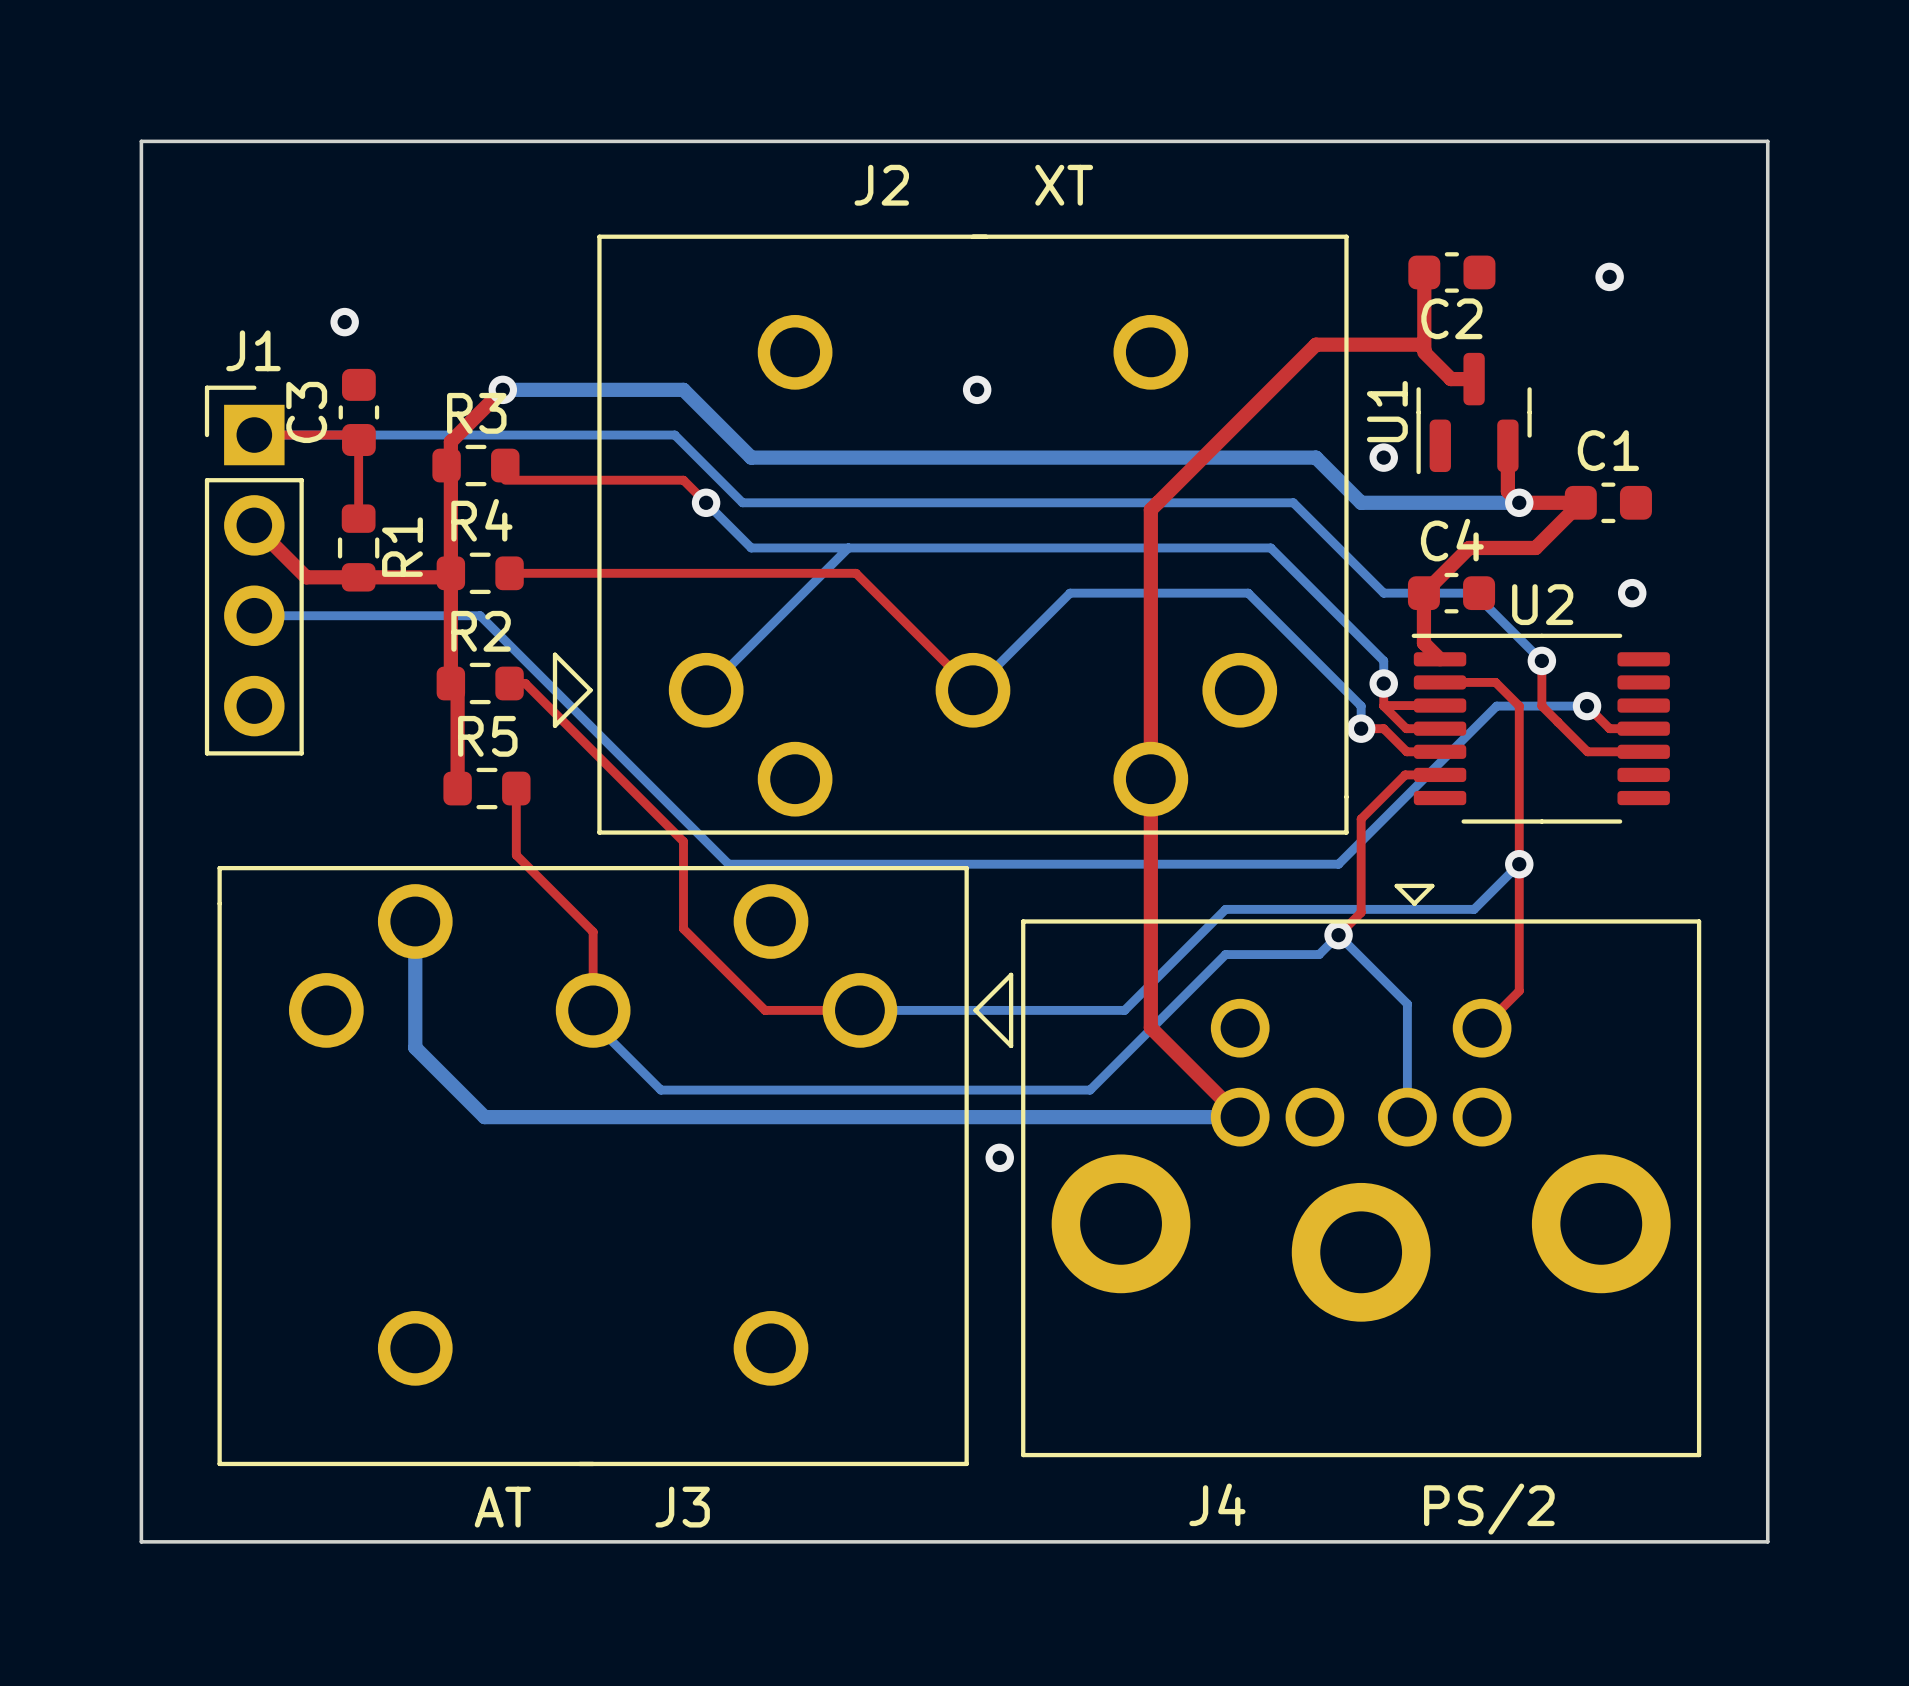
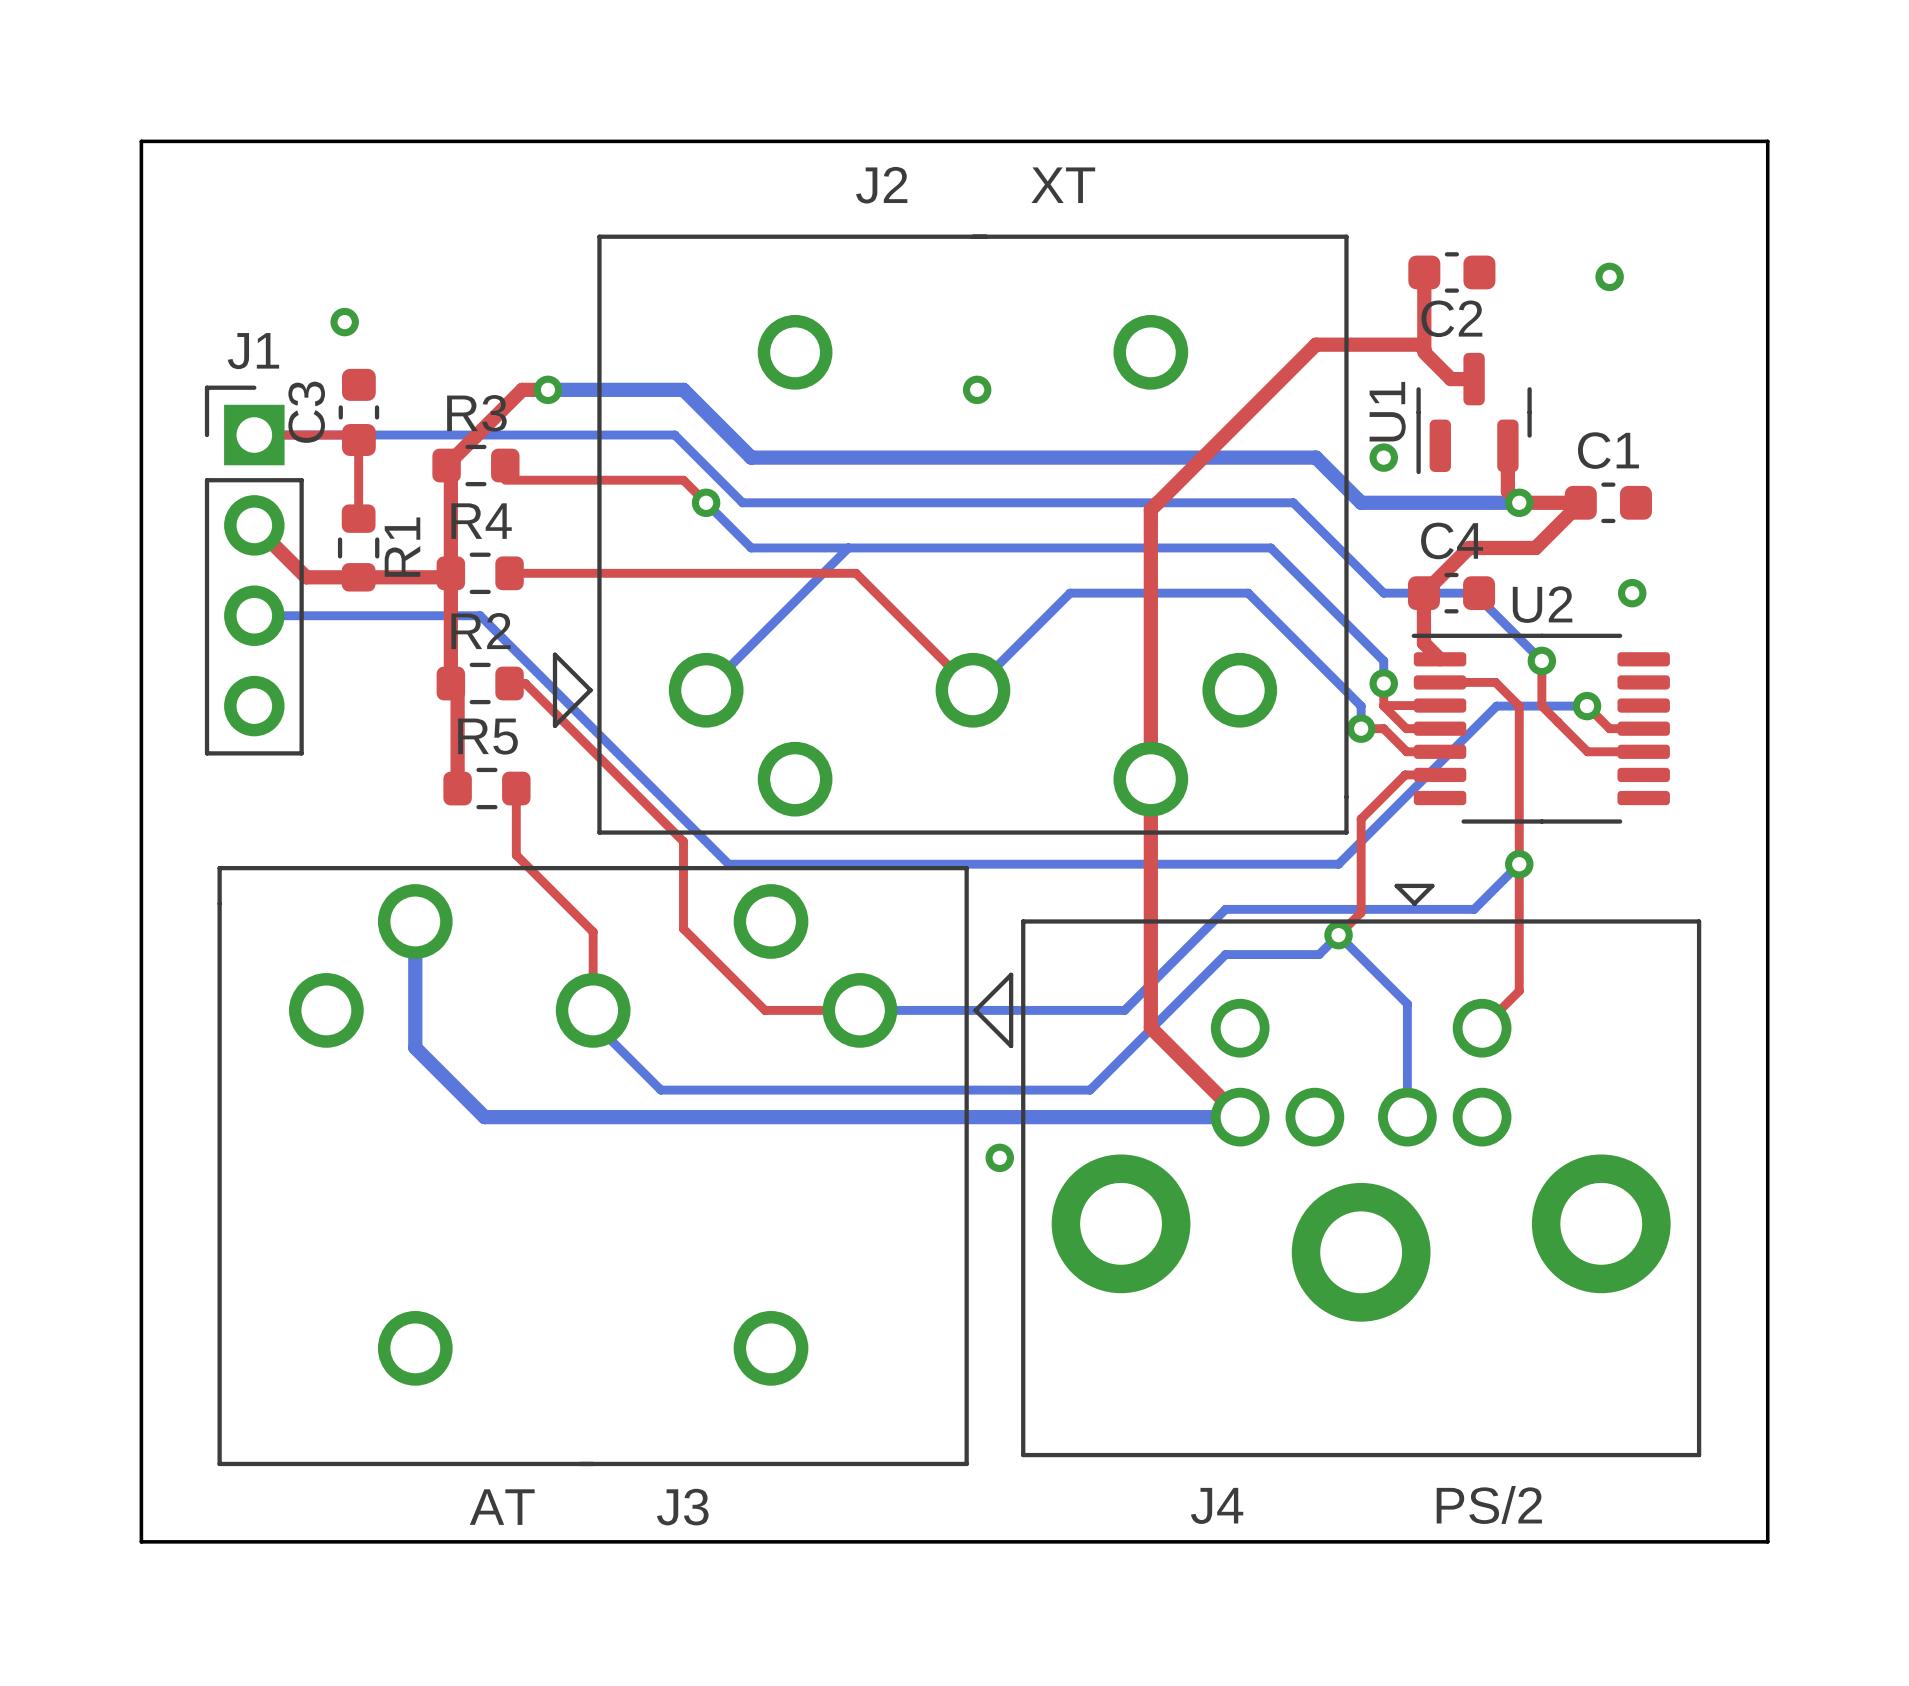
top track: (502, 389) (450, 441) (450, 461) -> (547, 389) (522, 389) (450, 461)
bottom track: (502, 389) (547, 389) -> none
via position: (502, 389) -> (547, 389)

